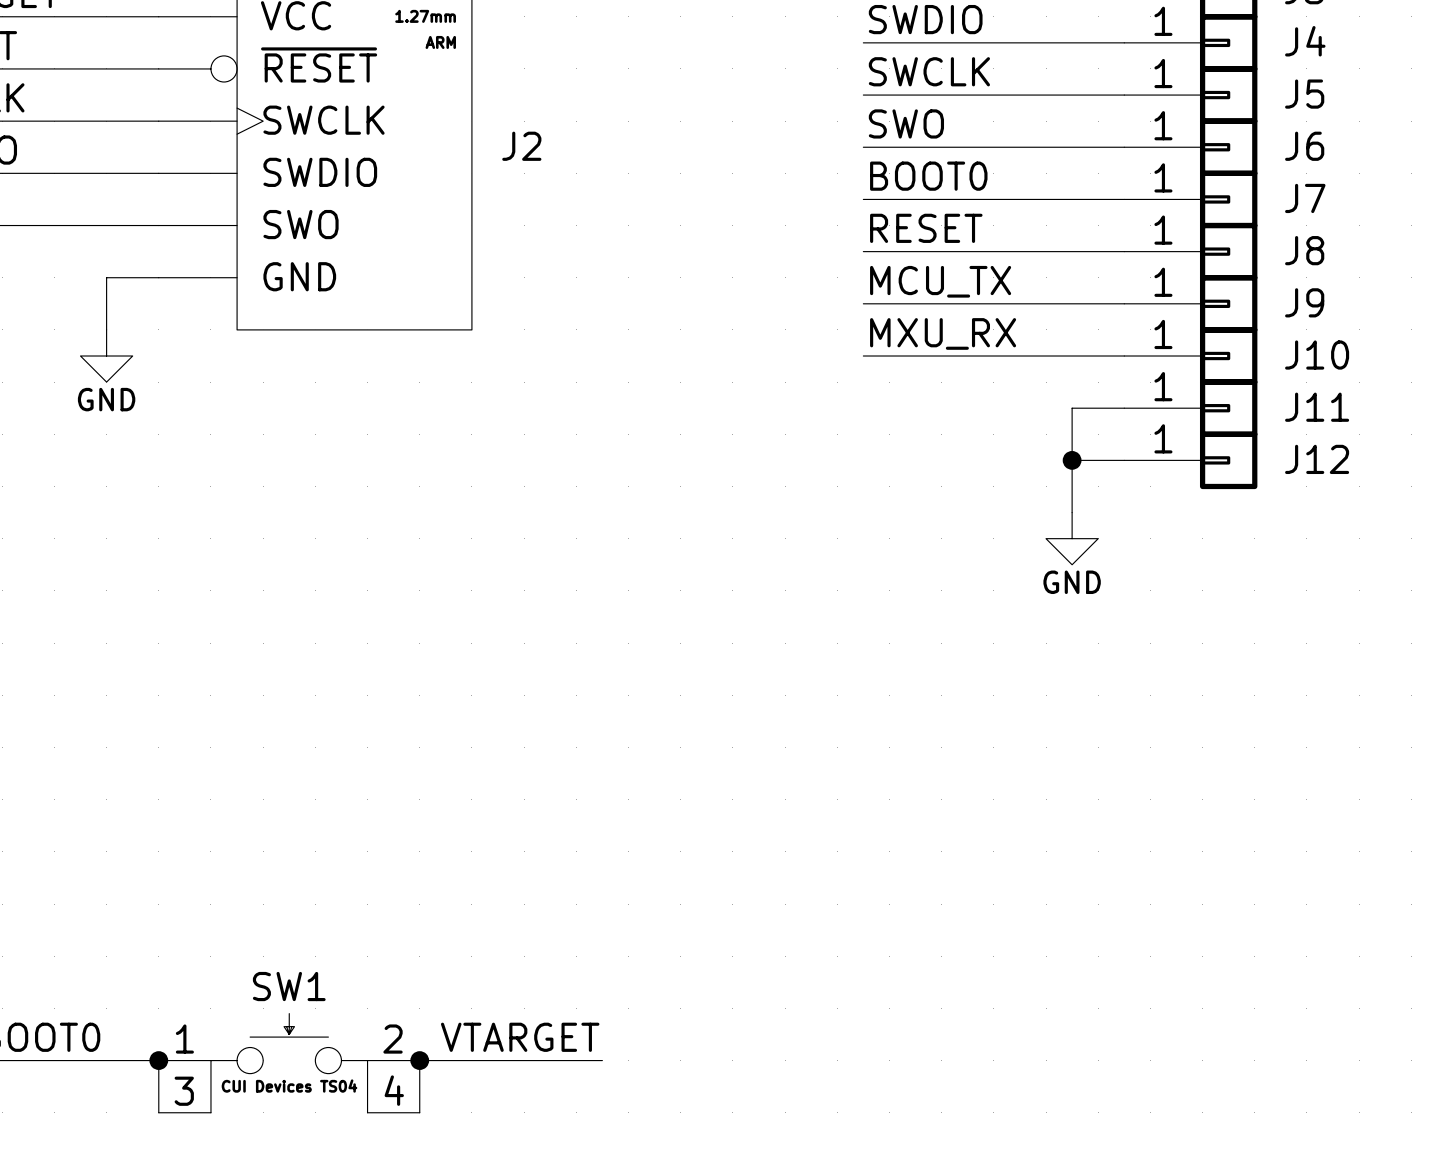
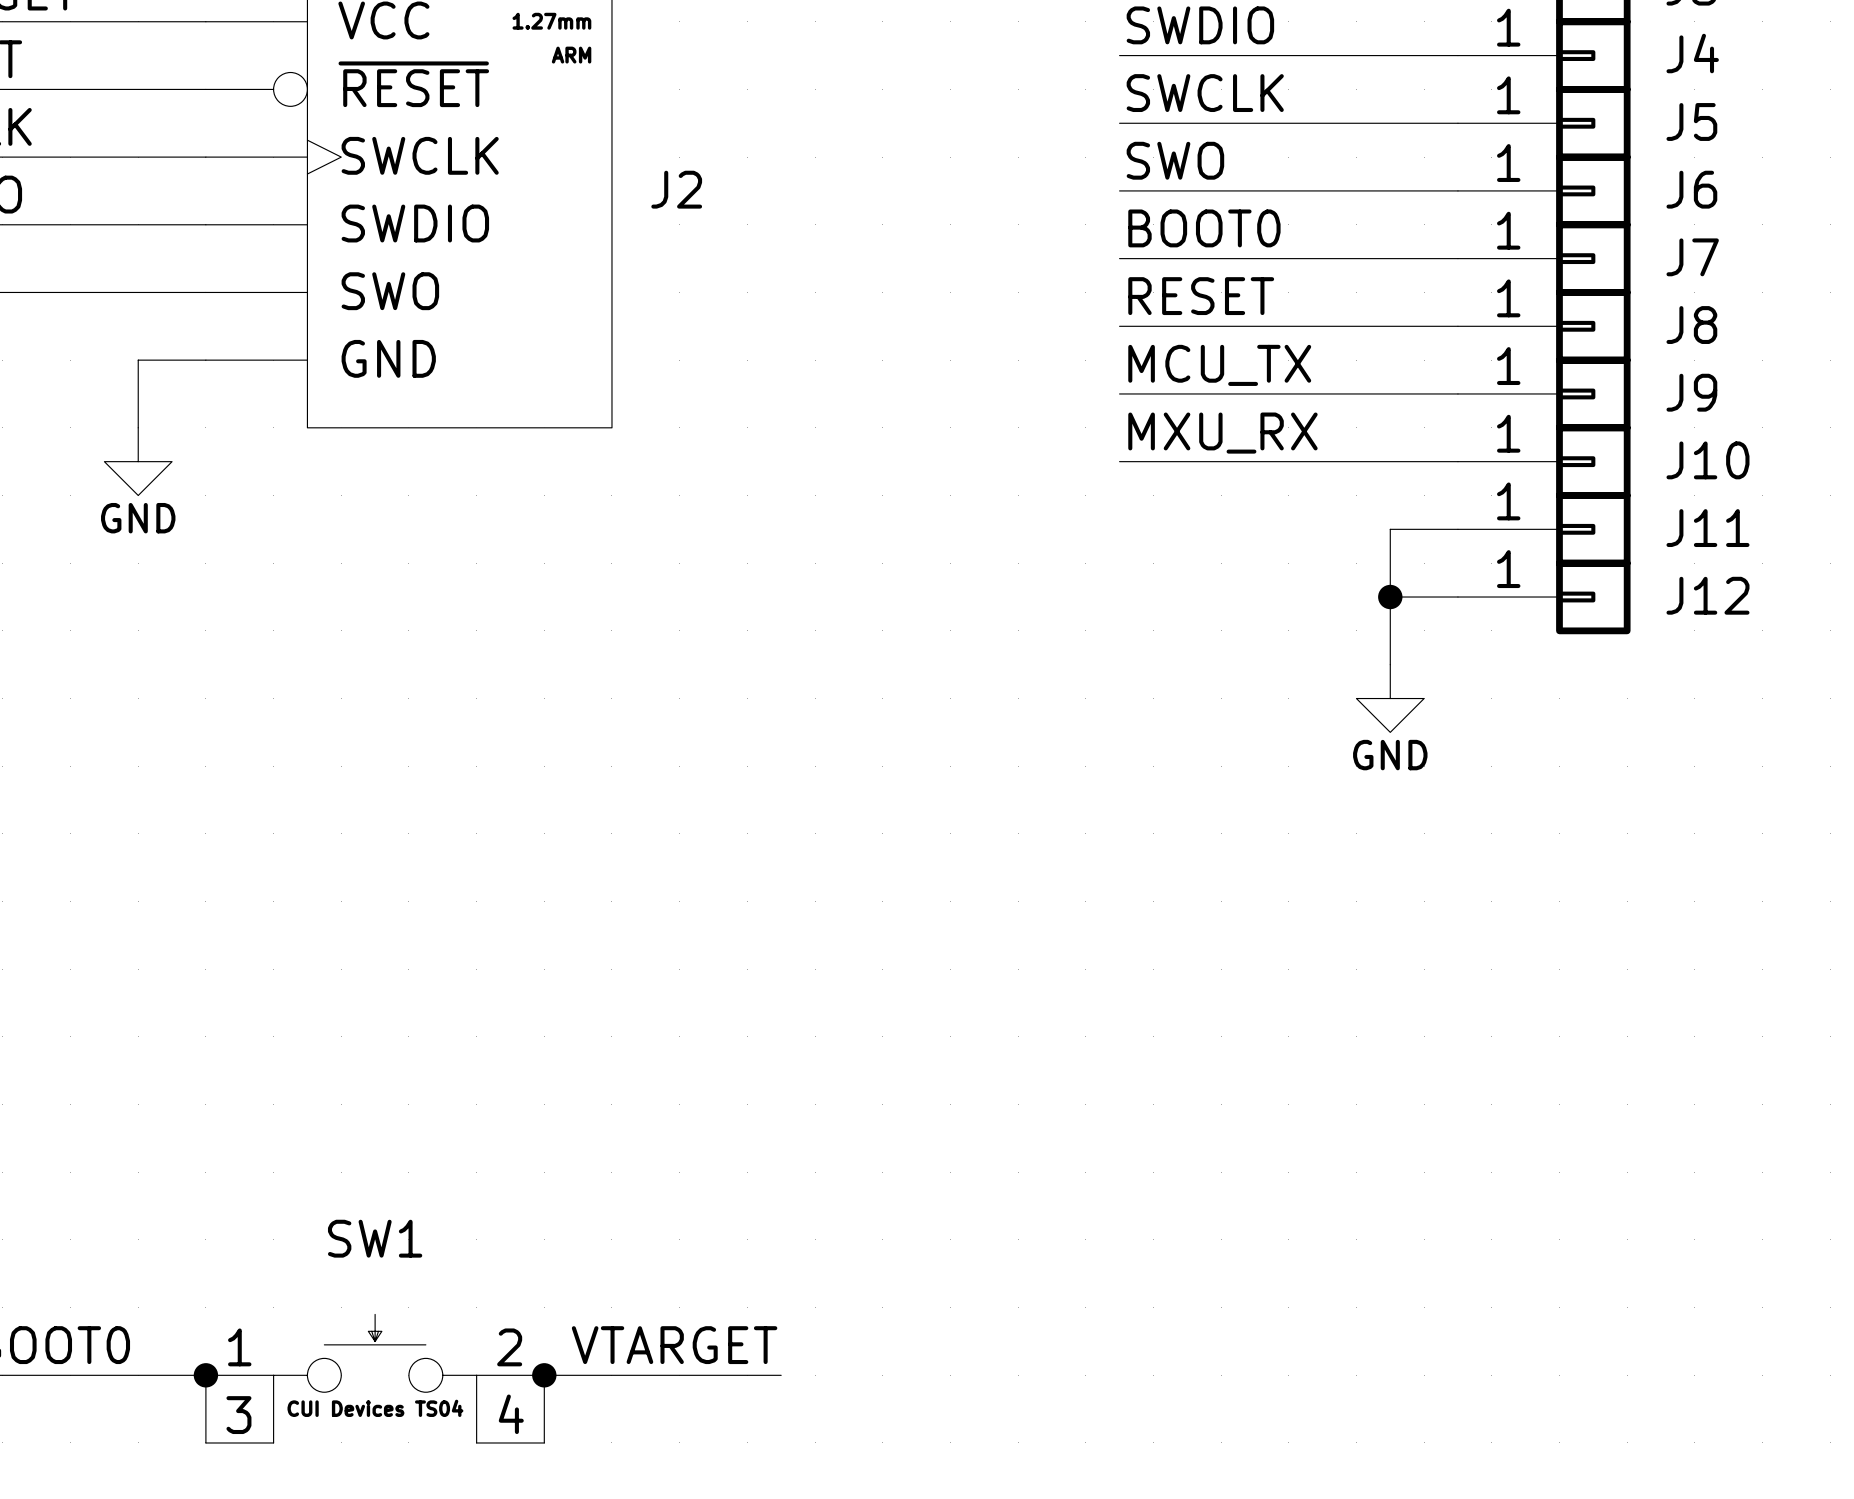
SW1 name position: SW1 (289, 986) -> SW1 (375, 1238)

